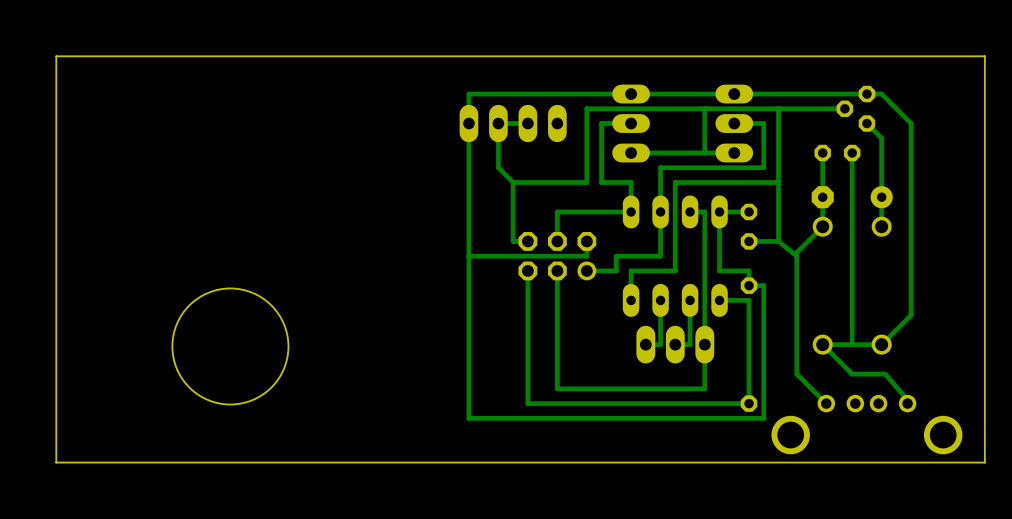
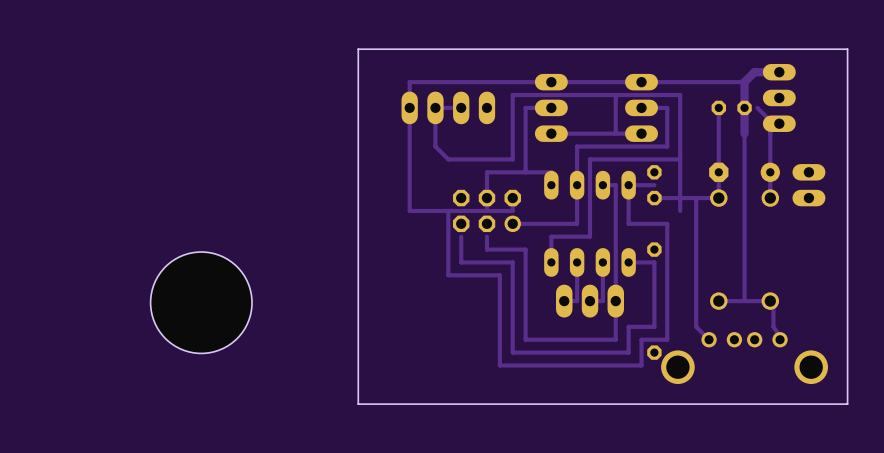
board edge: (410, 56) (56, 56) (56, 462) (410, 462) -> (358, 49) (358, 404)
board edge: (970, 56) (984, 56) (984, 462) (970, 462) -> (847, 49) (847, 404)
track: none -> (779, 72) (754, 72) (744, 82) (744, 133)
track: (852, 94) (881, 94) (911, 123) (911, 315) (881, 344) -> (780, 339) (773, 326) (773, 304) (770, 301)
track: (844, 108) (778, 108) -> none
part: (855, 108) -> none
part: none -> (779, 97)
track: none -> (718, 107) (718, 133)
part position: (837, 152) -> (731, 107)
track: (513, 182) (513, 241) -> none
track: (601, 182) (631, 182) (631, 197) -> (525, 159) (525, 172)
track: (631, 211) (557, 211) -> (551, 172) (486, 172) (486, 185)
part: none -> (808, 185)
track: none -> (512, 198) (512, 210) (461, 210)
part position: (749, 226) -> (654, 185)
track: (822, 226) (796, 252) -> (696, 198) (696, 220)
track: none -> (718, 198) (654, 198)
track: (468, 241) (468, 418) (572, 418) -> (409, 210) (448, 210) (448, 275) (499, 275) (499, 365)
track: (586, 241) (586, 256) (468, 256) -> none
track: (749, 241) (778, 241) (796, 256) -> none
part position: (557, 256) -> (486, 210)
track: (616, 256) (616, 270) (586, 270) -> (538, 223) (512, 223)
track: (719, 256) (719, 270) (749, 270) (749, 285) (763, 285) -> (628, 223) (667, 223) (667, 249)
track: (557, 285) (557, 388) (601, 388) -> (486, 249) (525, 249) (525, 339)
track: (527, 300) (527, 403) (586, 403) -> (461, 262) (512, 262) (512, 352)
track: (822, 344) (852, 374) (885, 374) (907, 399) (907, 403) -> none
track: (749, 374) (749, 403) (719, 403) -> (654, 326) (628, 326) (628, 352)
track: (763, 388) (763, 418) (734, 418) -> (667, 339) (641, 339) (641, 365)
track: (811, 388) (826, 403) -> none
part position: (866, 424) -> (744, 358)

